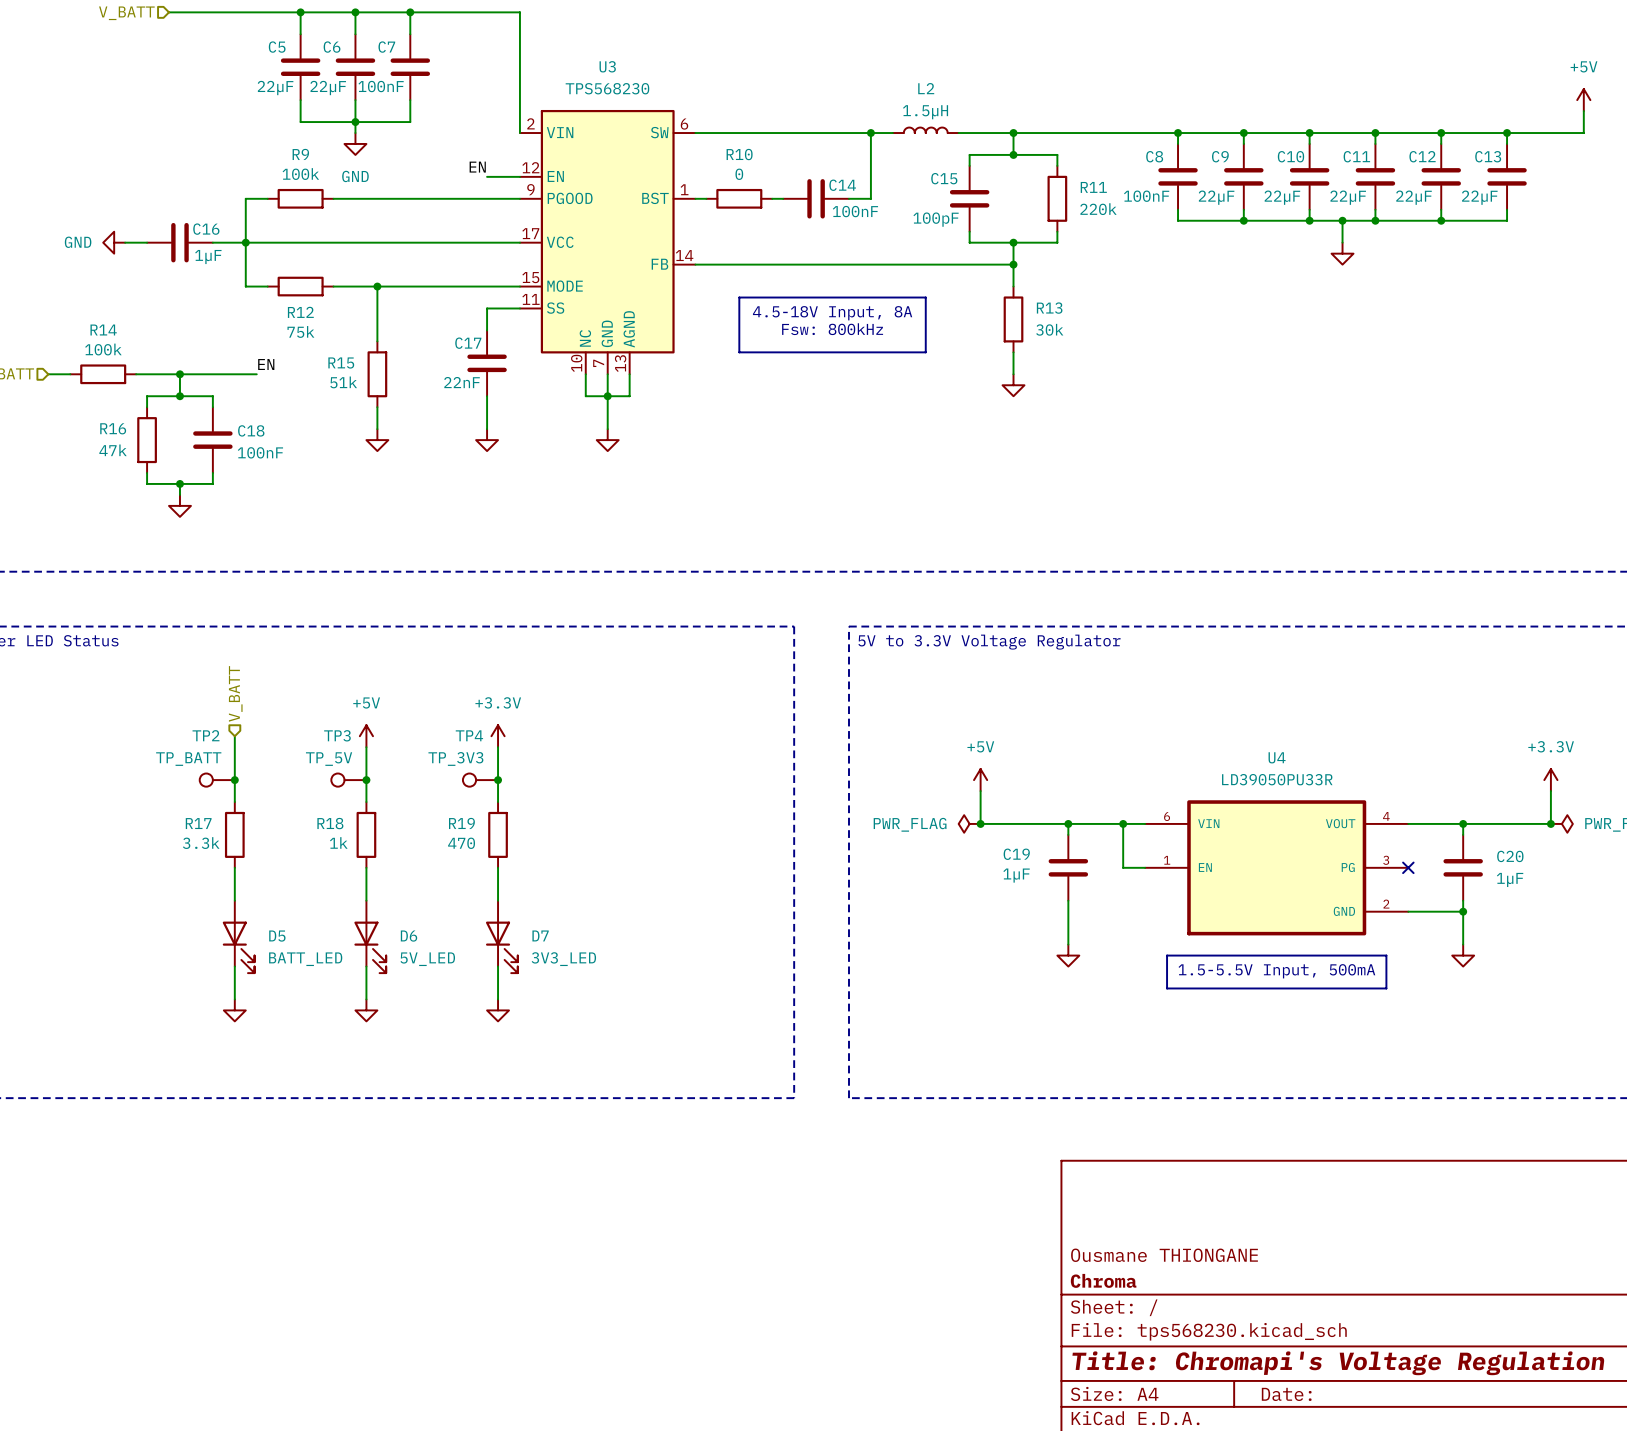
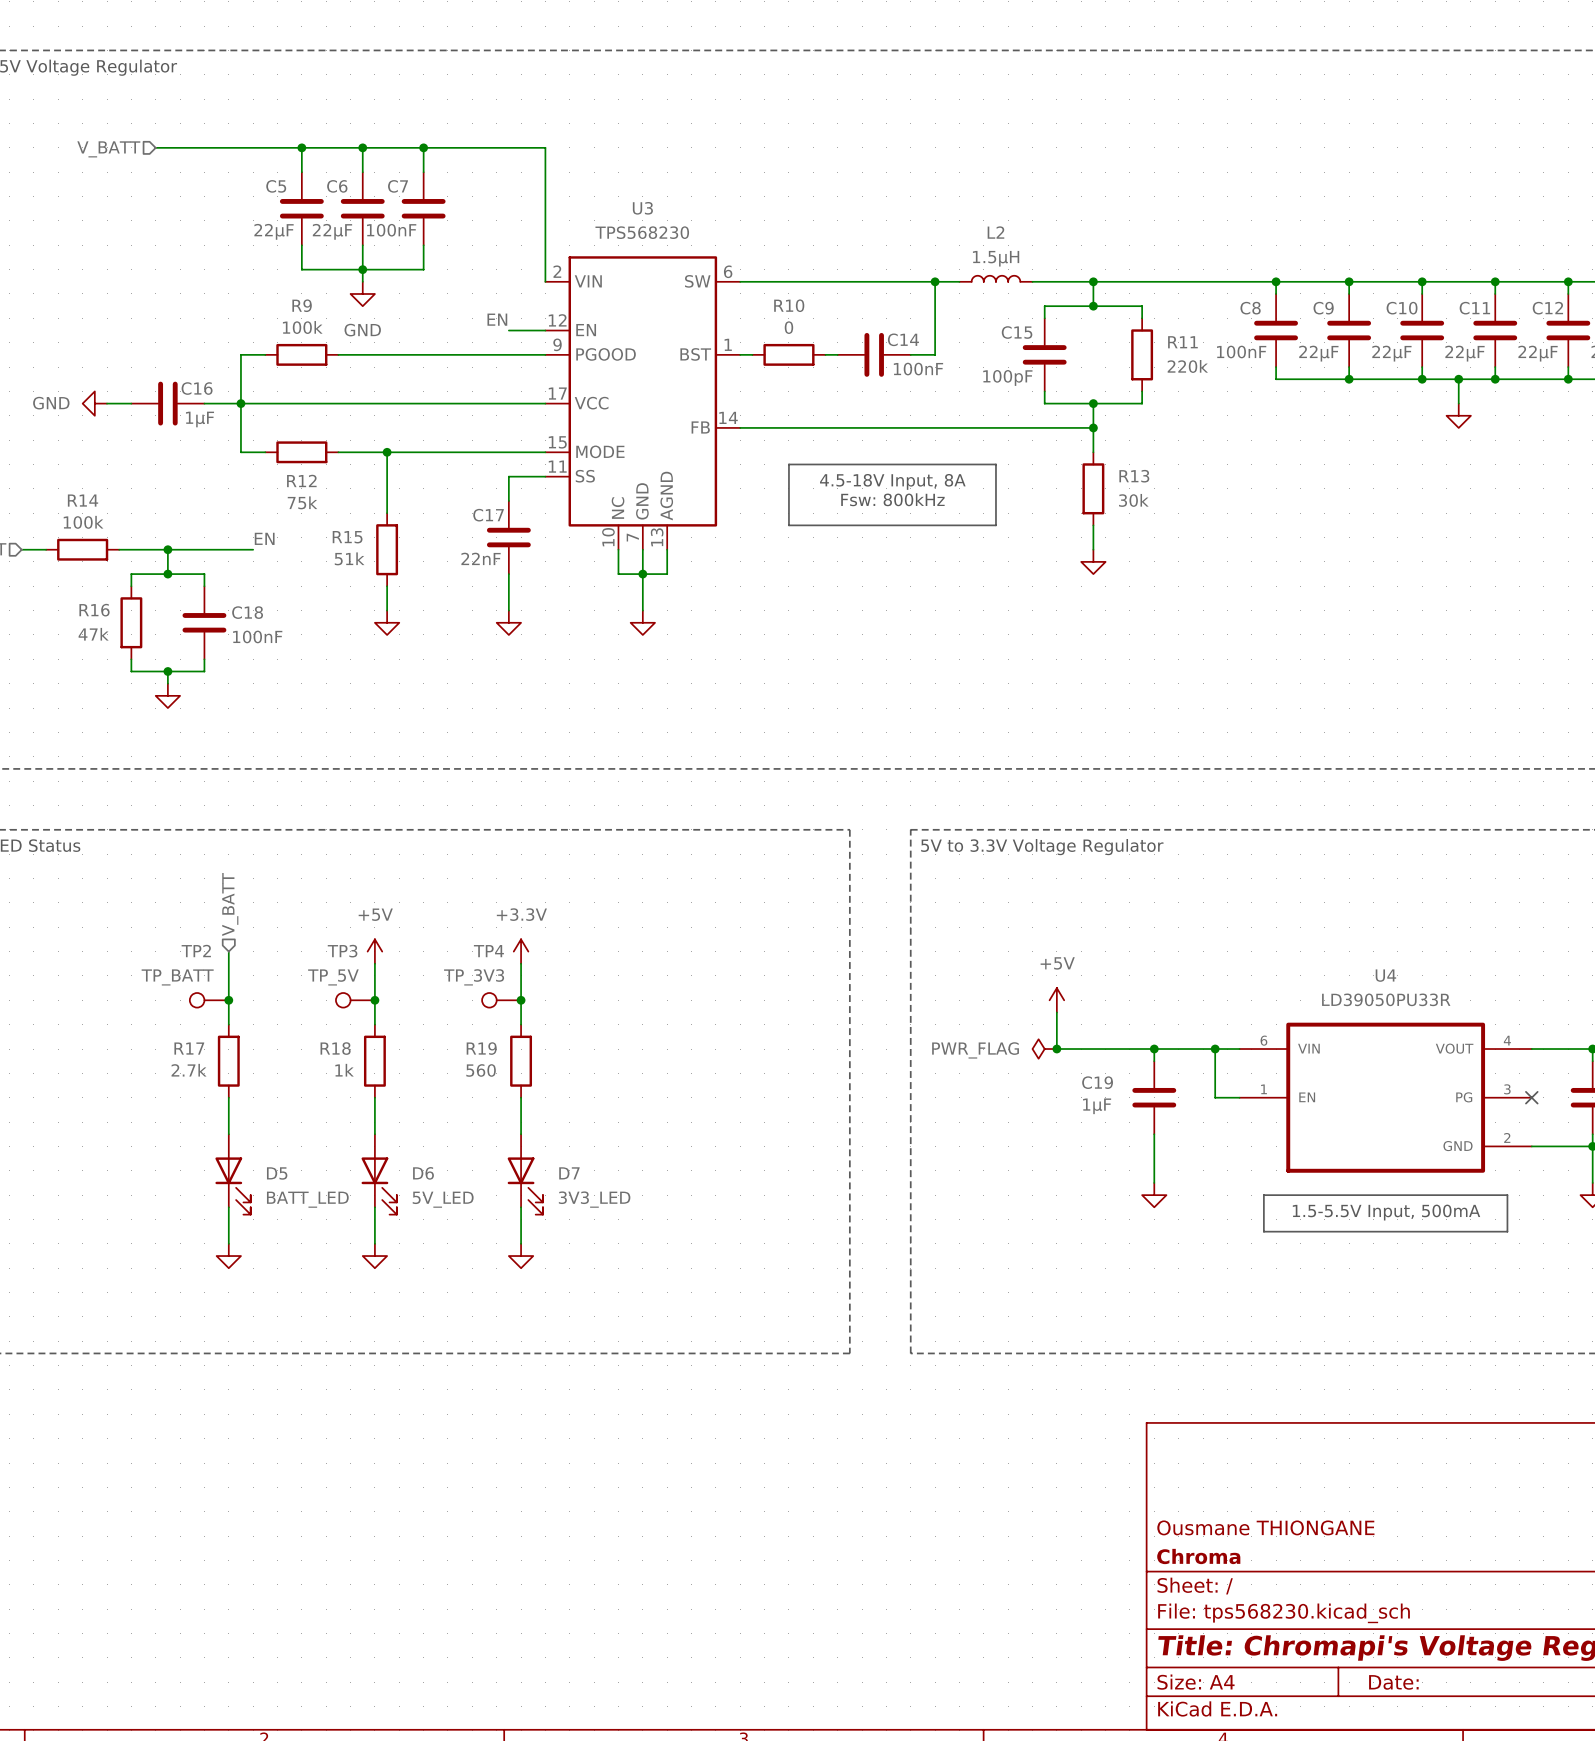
R17 value: 3.3k (201, 843) -> 2.7k (189, 1070)
R19 value: 470 (461, 843) -> 560 (481, 1070)

